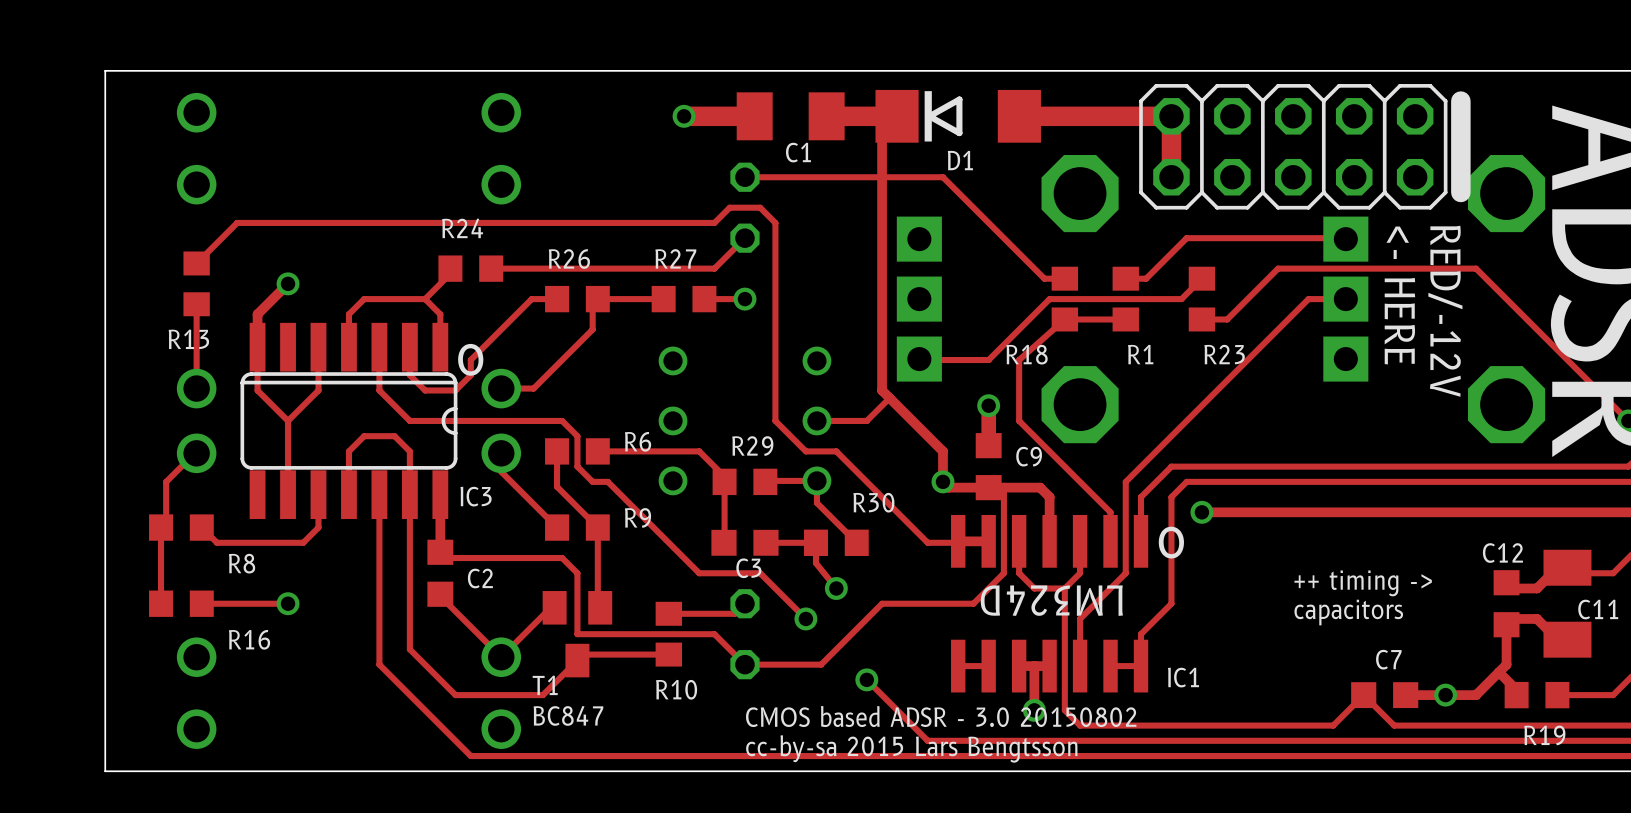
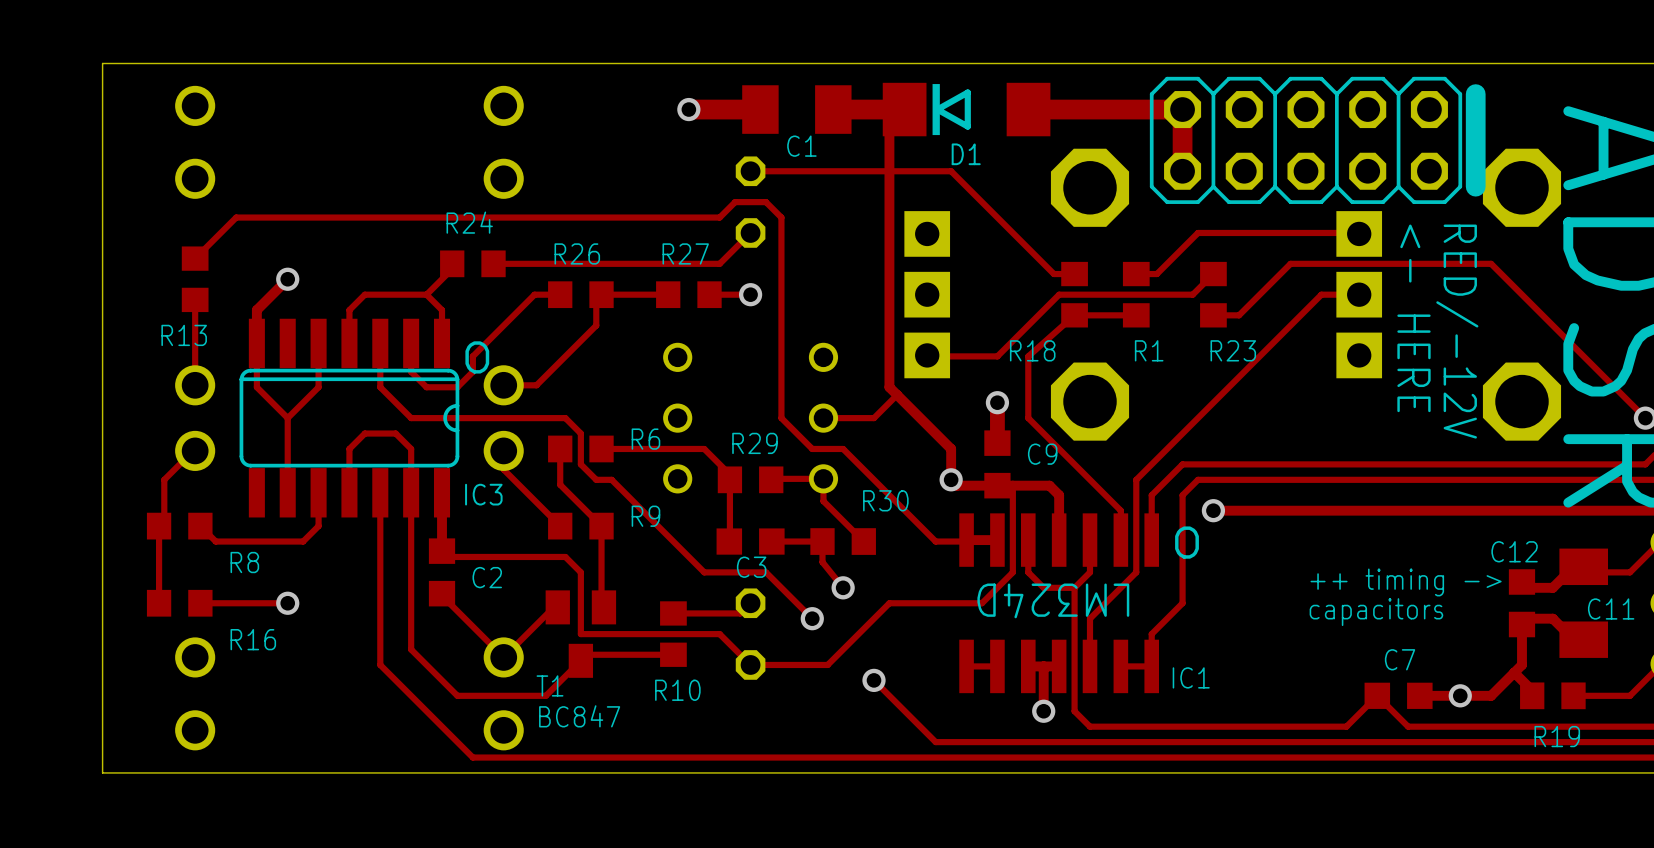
text: CMOS based ADSR - 3.0 20150802 (941, 716) -> none
text: cc-by-sa 2015 Lars Bengtsson (911, 748) -> none

